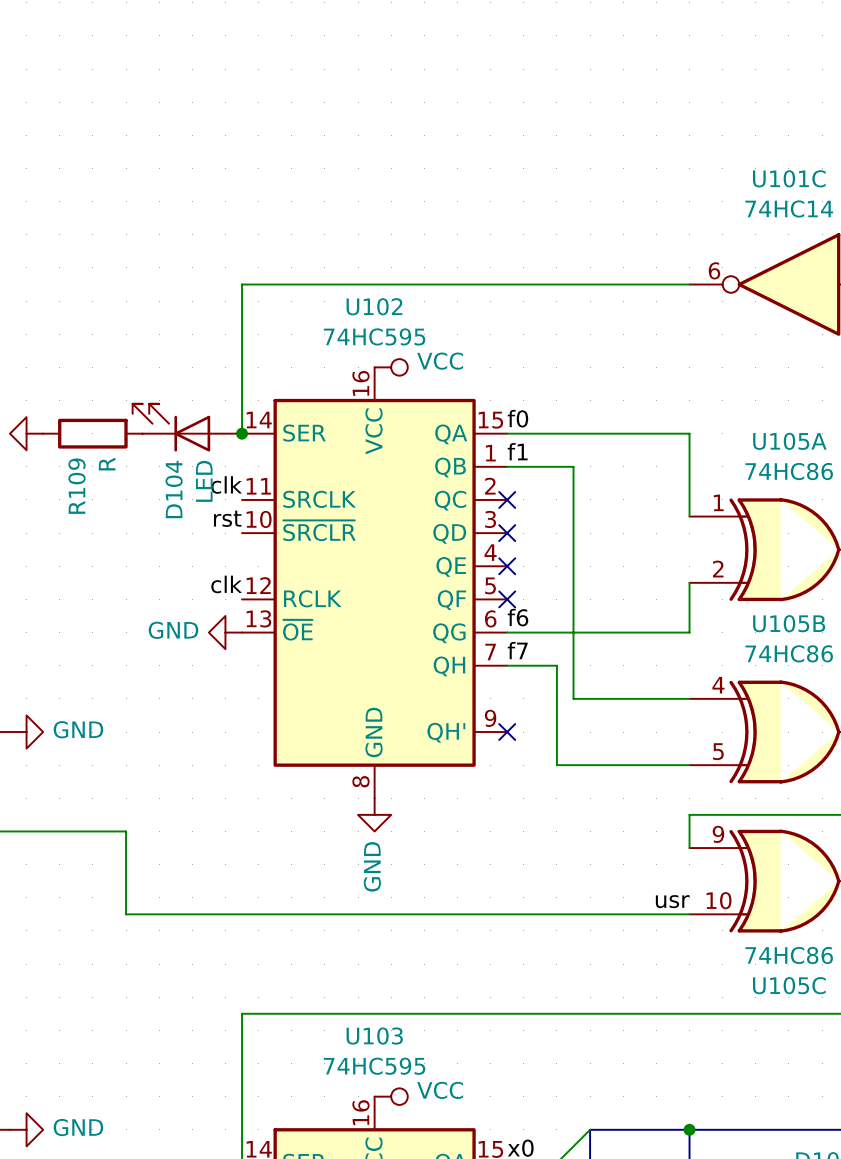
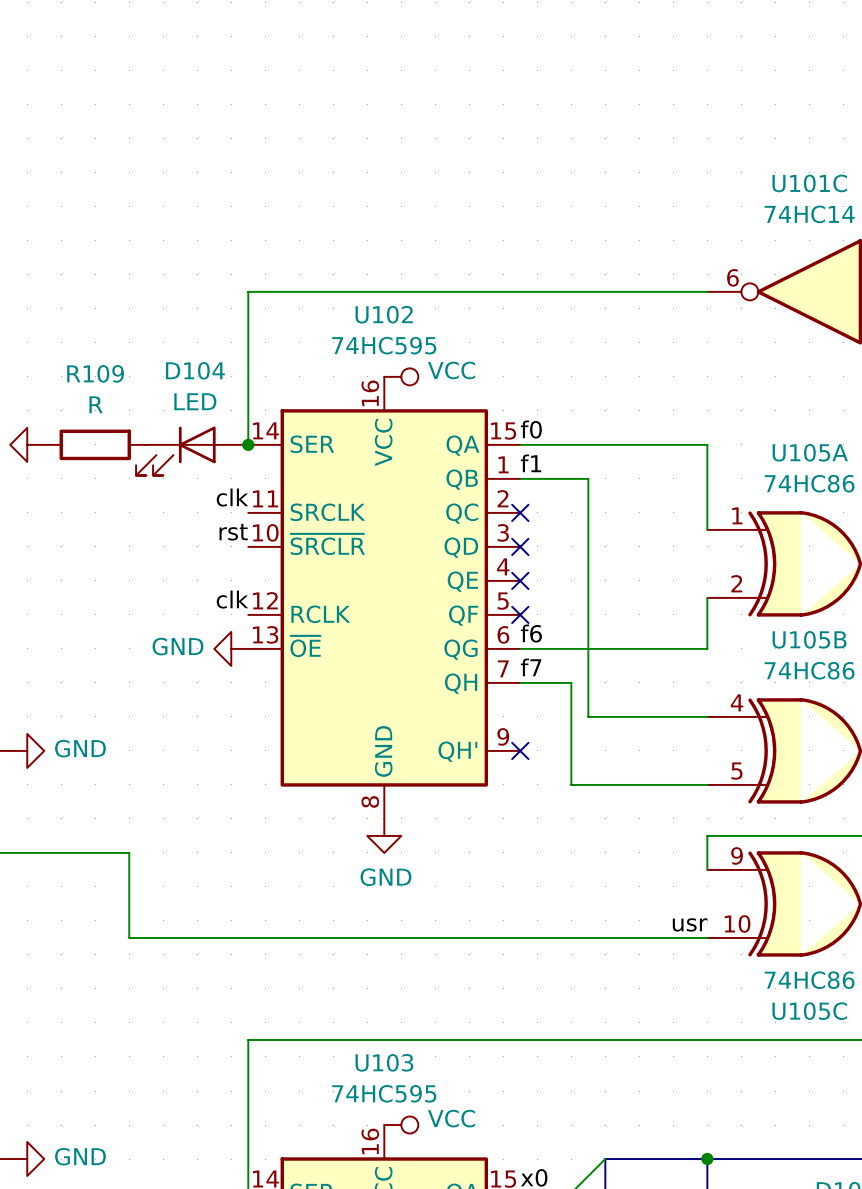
D104 flip: as is (171, 427) -> up-down (175, 451)
R109 value rotation: 0° (107, 463) -> 90° clockwise (96, 404)
R109 value position: R (107, 463) -> R (96, 404)
R109 name rotation: 0° (77, 486) -> 90° clockwise (95, 373)
R109 name position: R109 (77, 486) -> R109 (95, 373)
power symbol text rotation: 0° (372, 866) -> 90° clockwise (385, 877)

